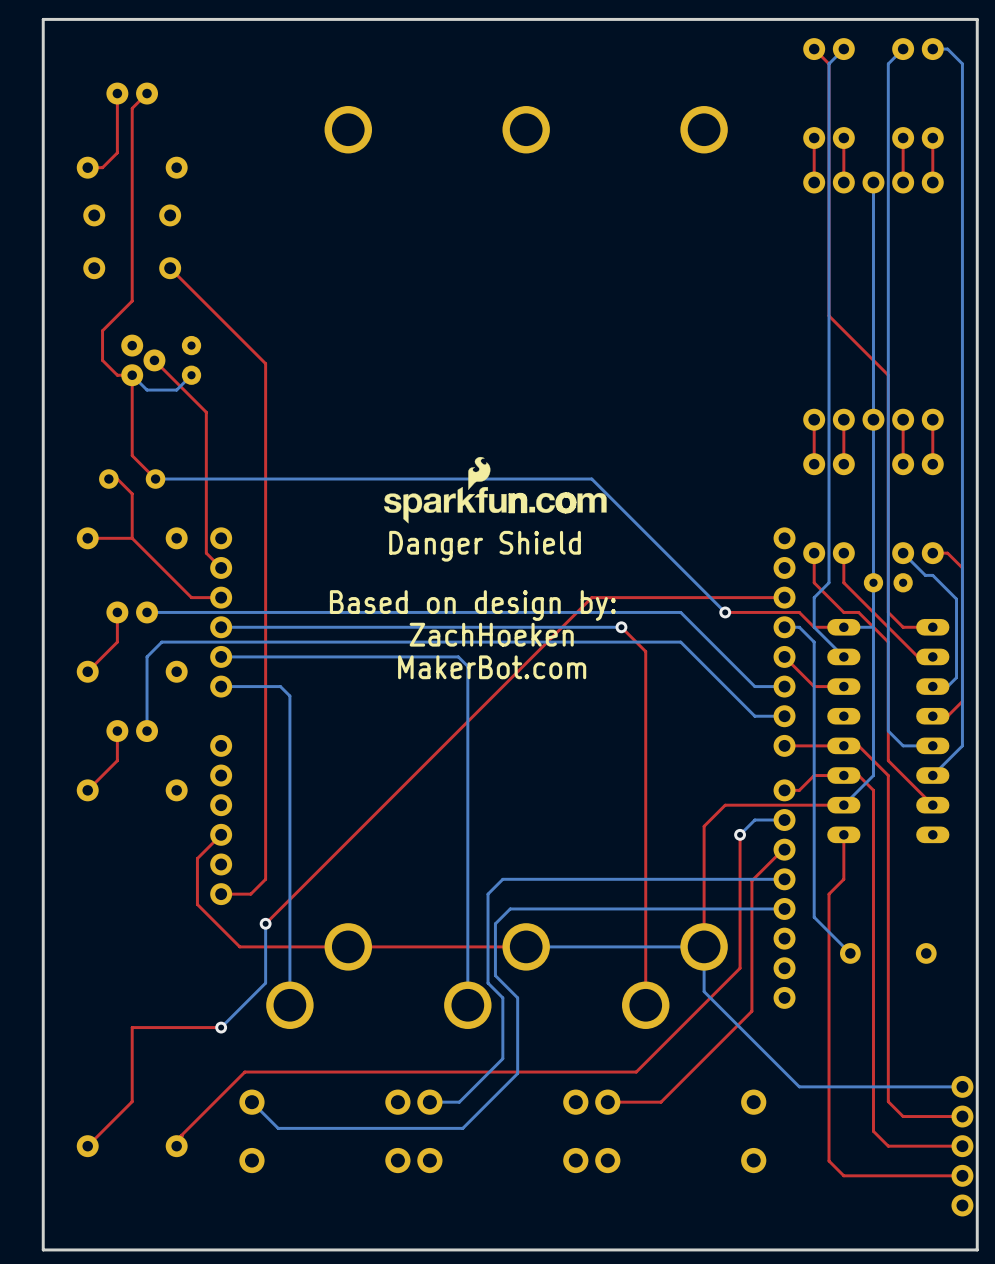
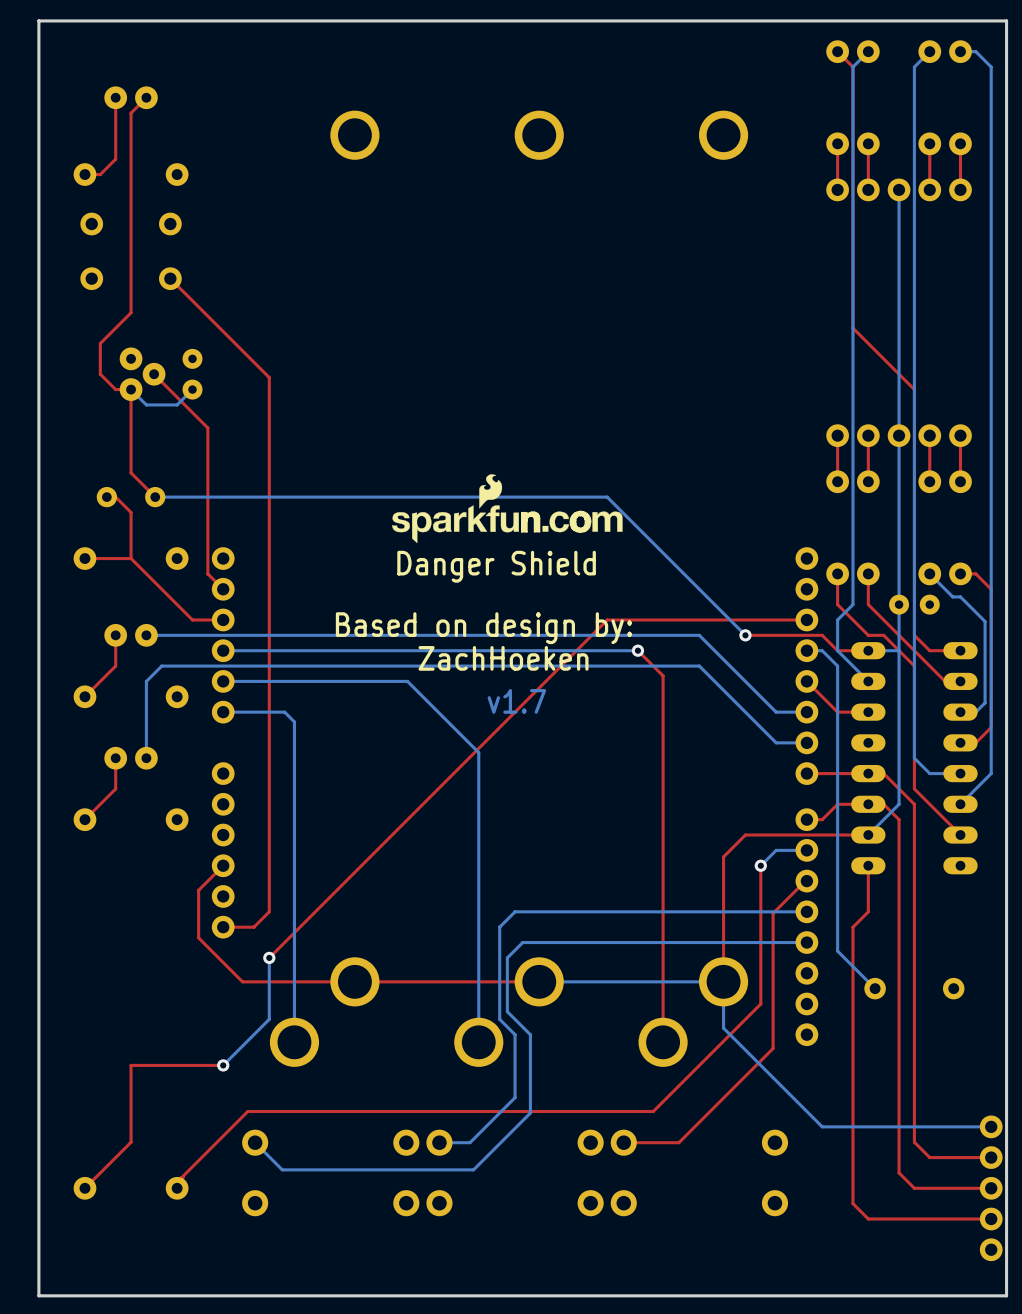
bottom track: (399, 656) (458, 656) (467, 666) (467, 725) -> (407, 681) (478, 752)
text: MakerBot.com (492, 667) -> none
text: none -> v1.7 (516, 701)

